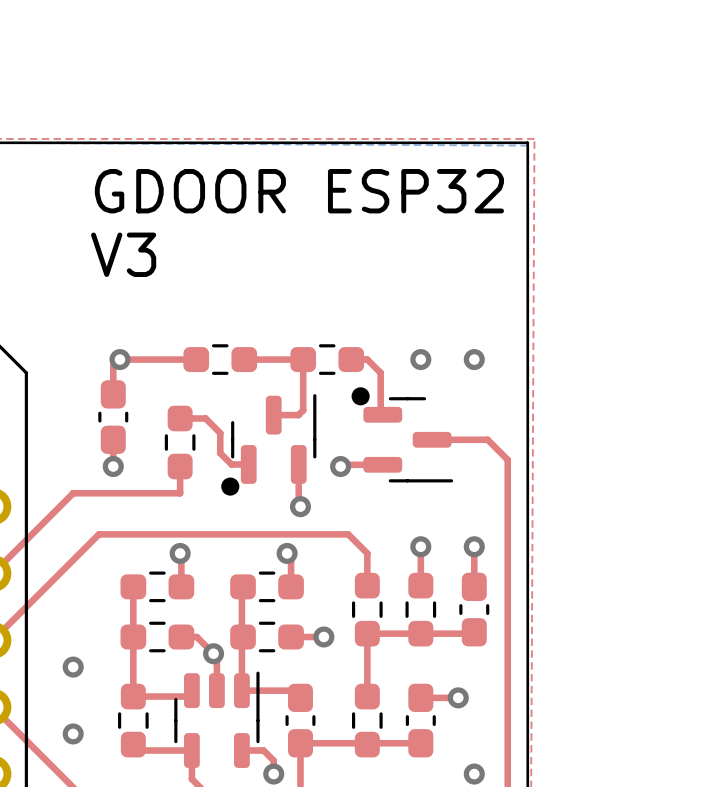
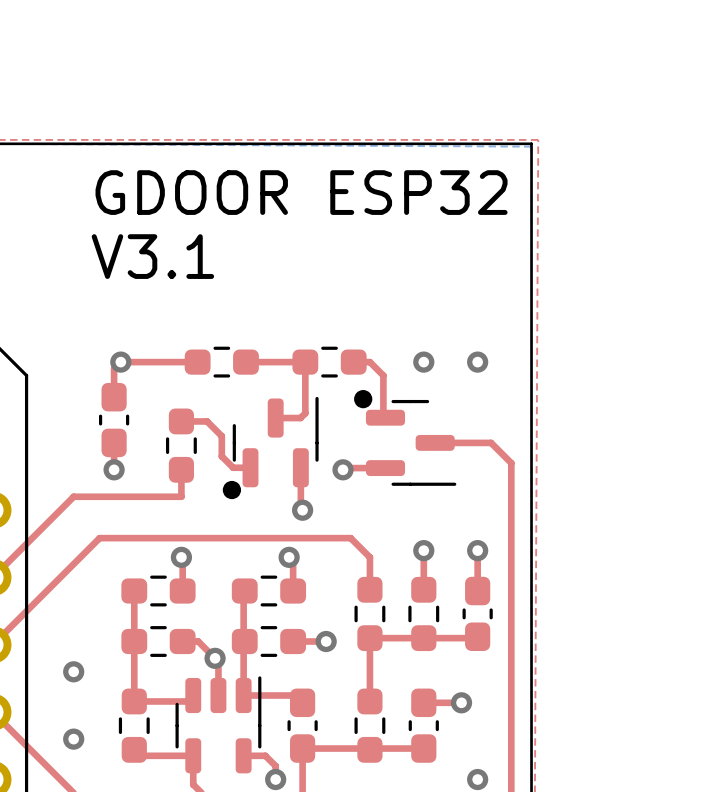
text: V3 (123, 254) -> V3.1 (152, 256)

